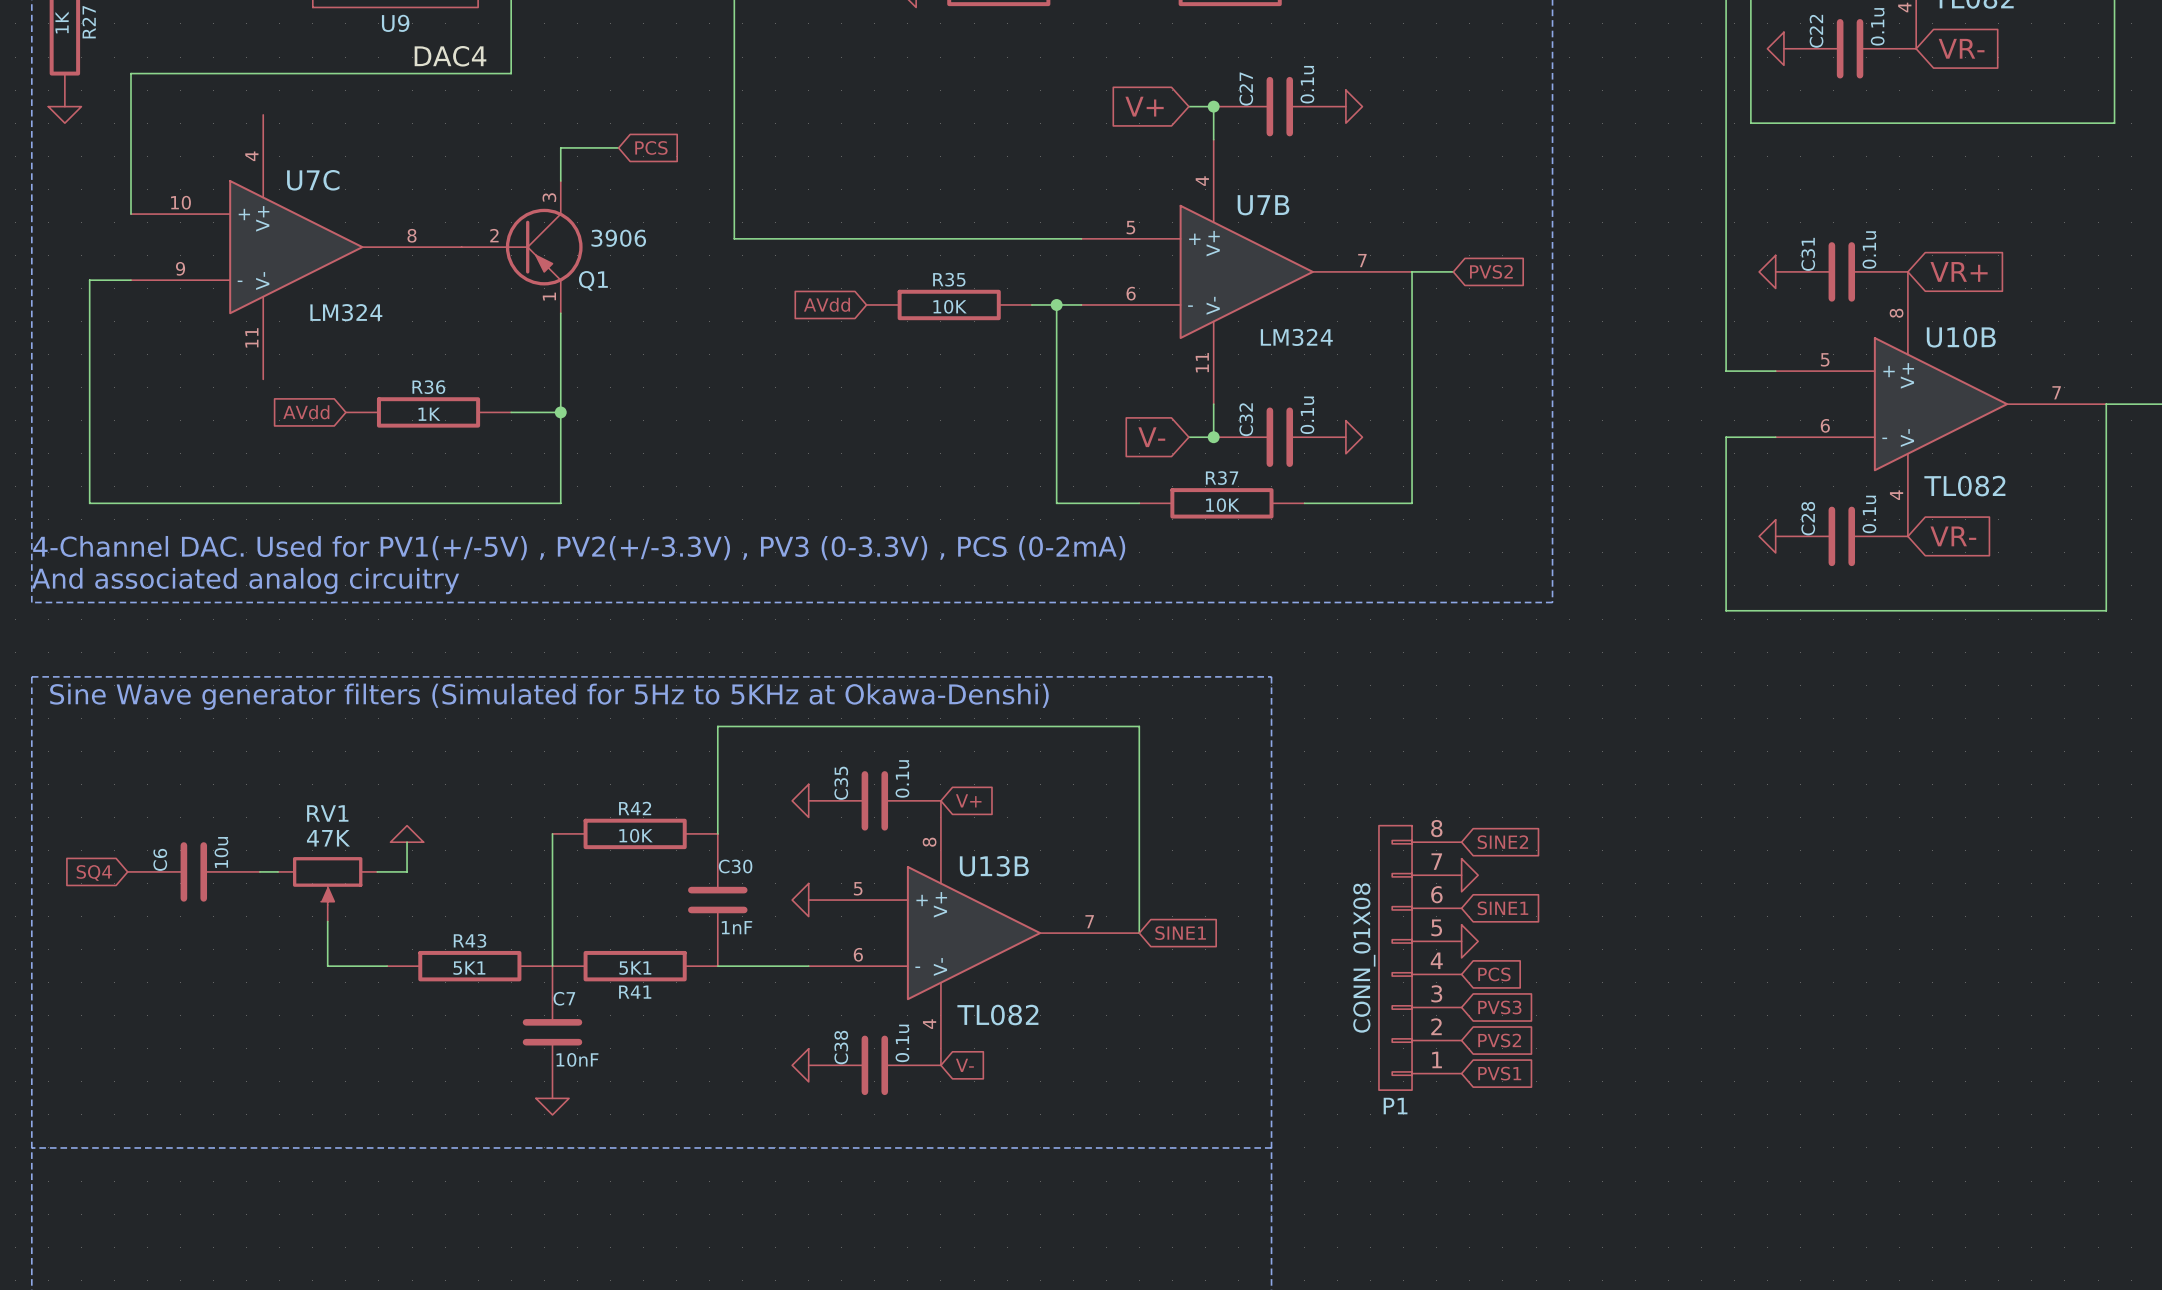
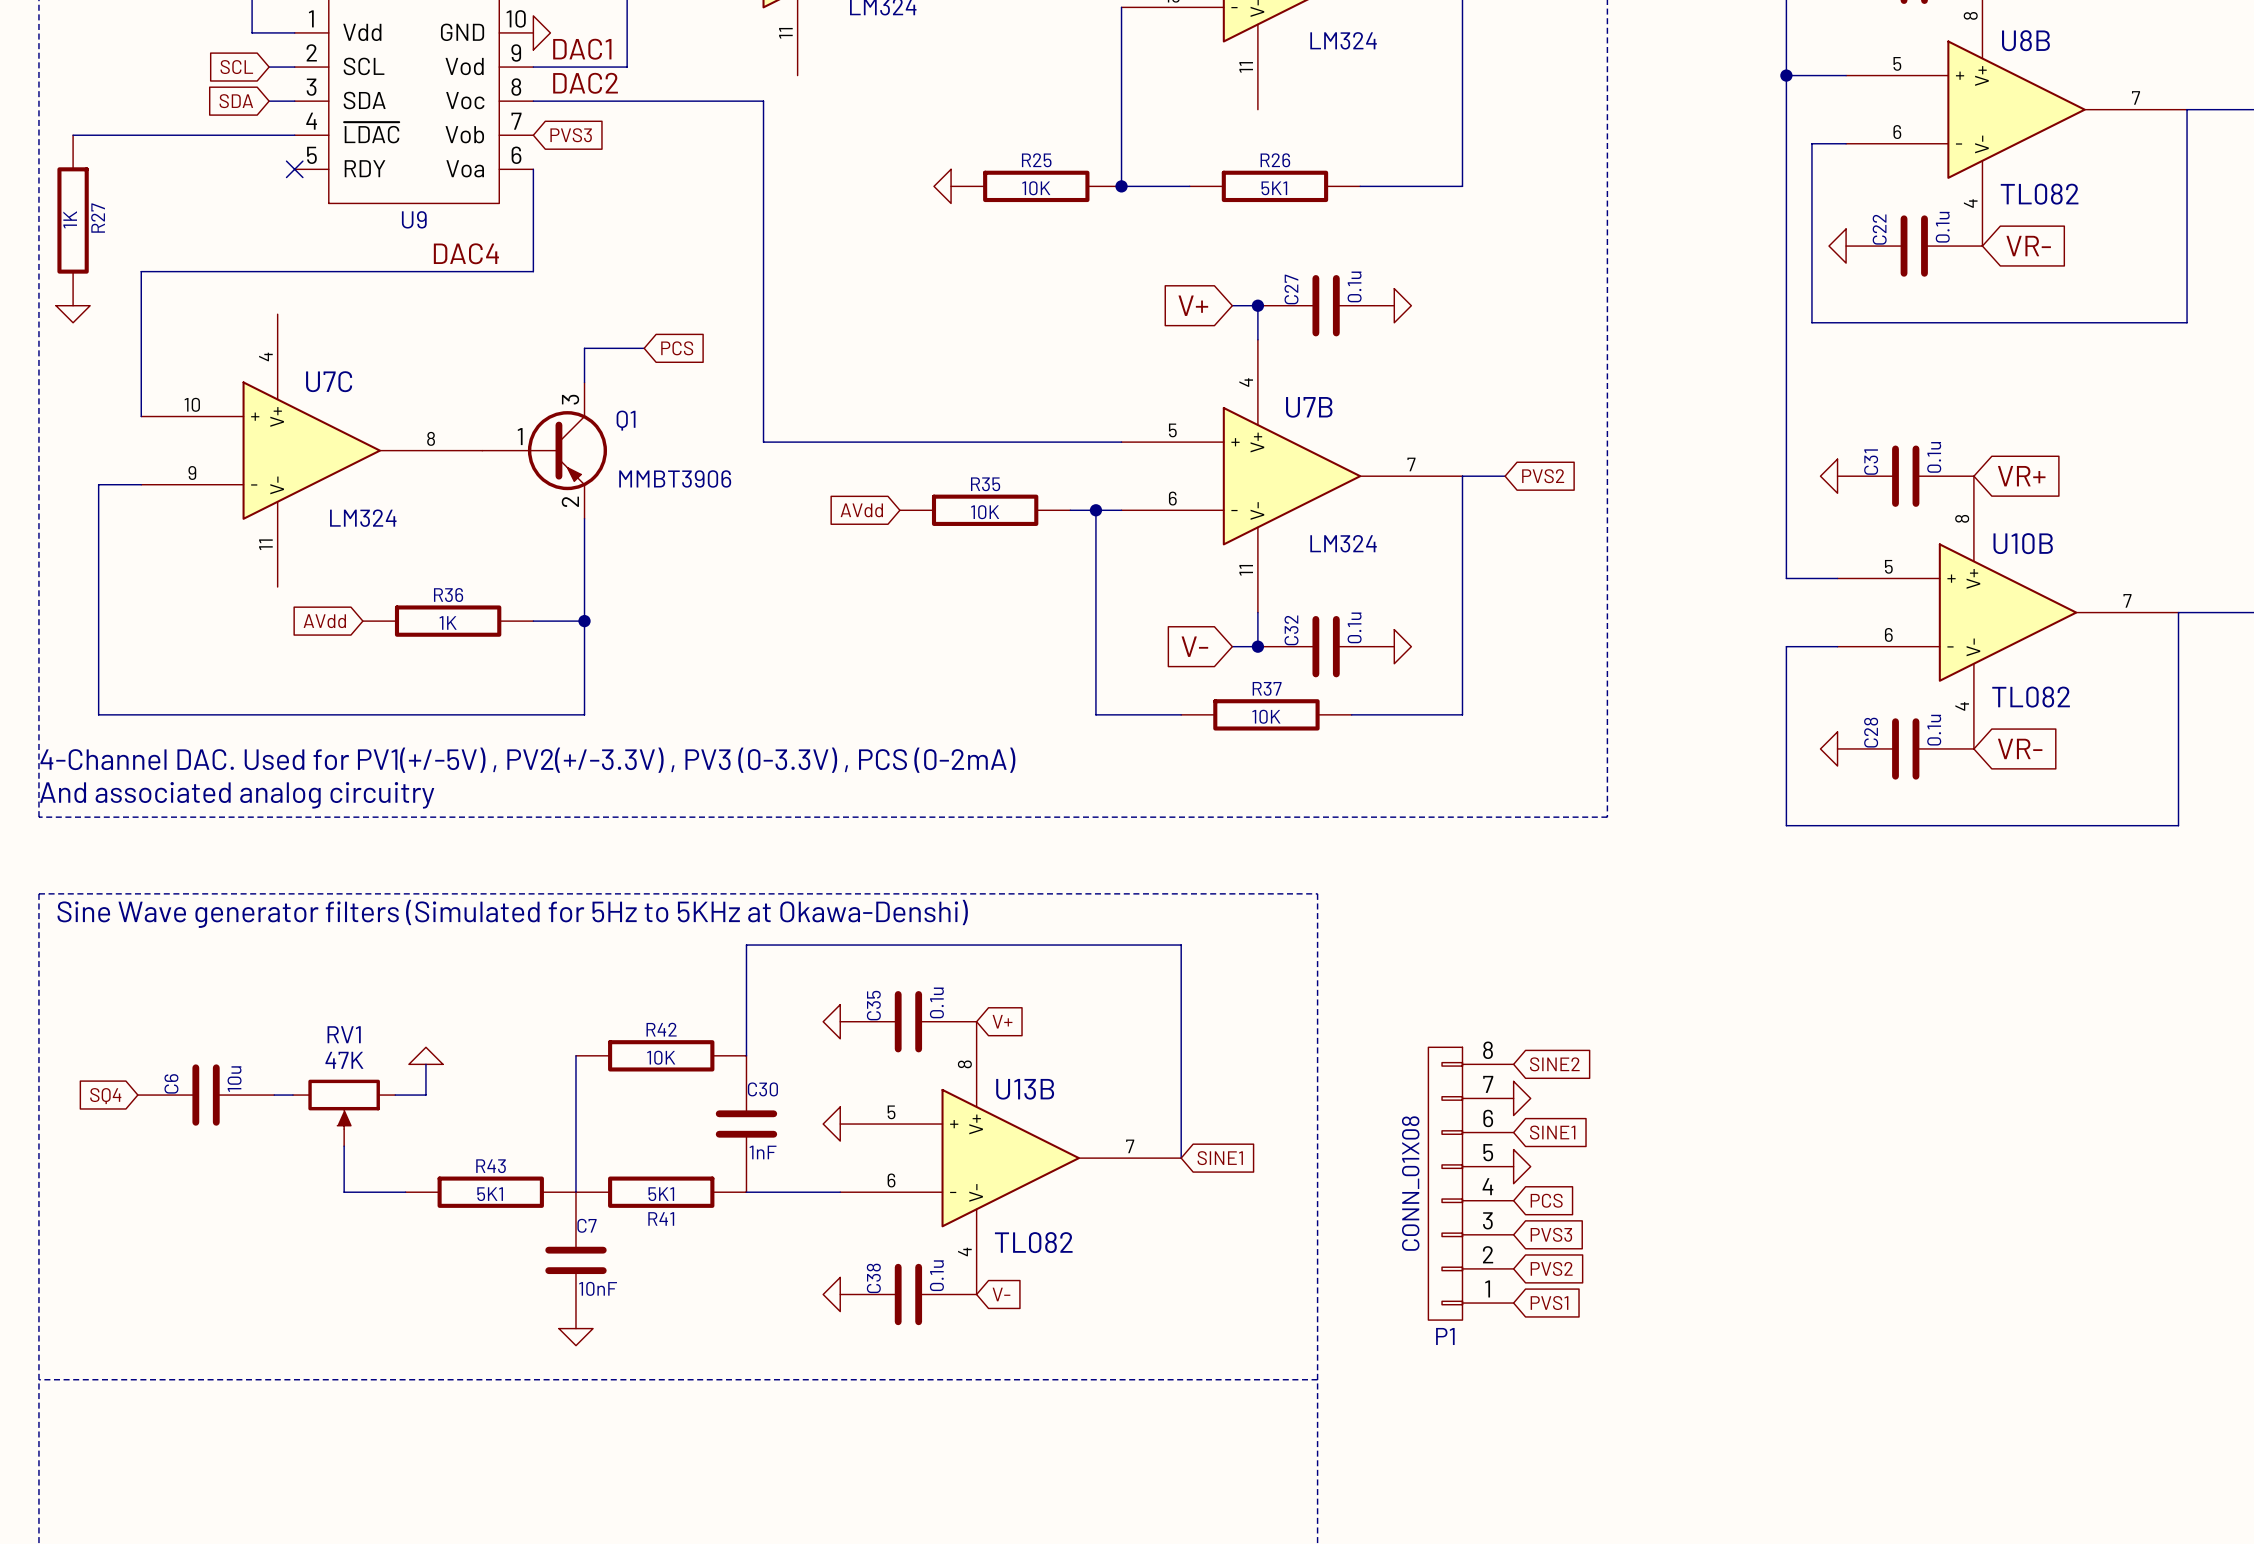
Q1 symbol: [461, 181, 583, 314] -> [482, 382, 608, 519]
Q1 value: 3906 (618, 238) -> MMBT3906 (675, 478)
Q1 name position: Q1 (593, 280) -> Q1 (626, 420)

